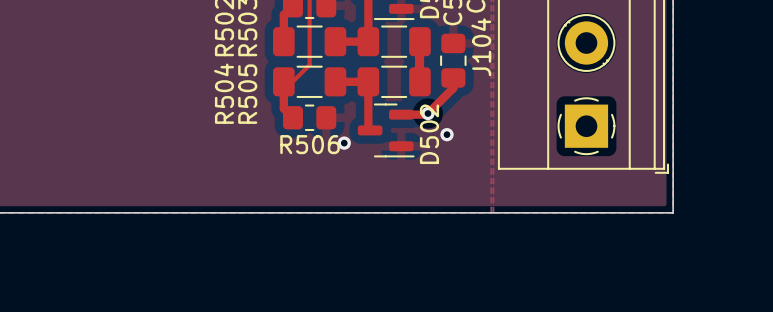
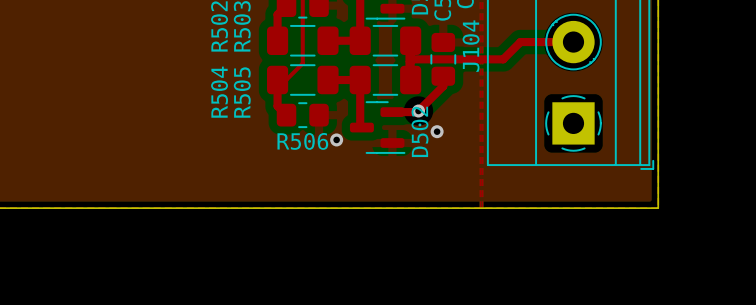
top track: none -> (573, 42) (520, 42) (503, 59) (411, 59) (409, 61)

